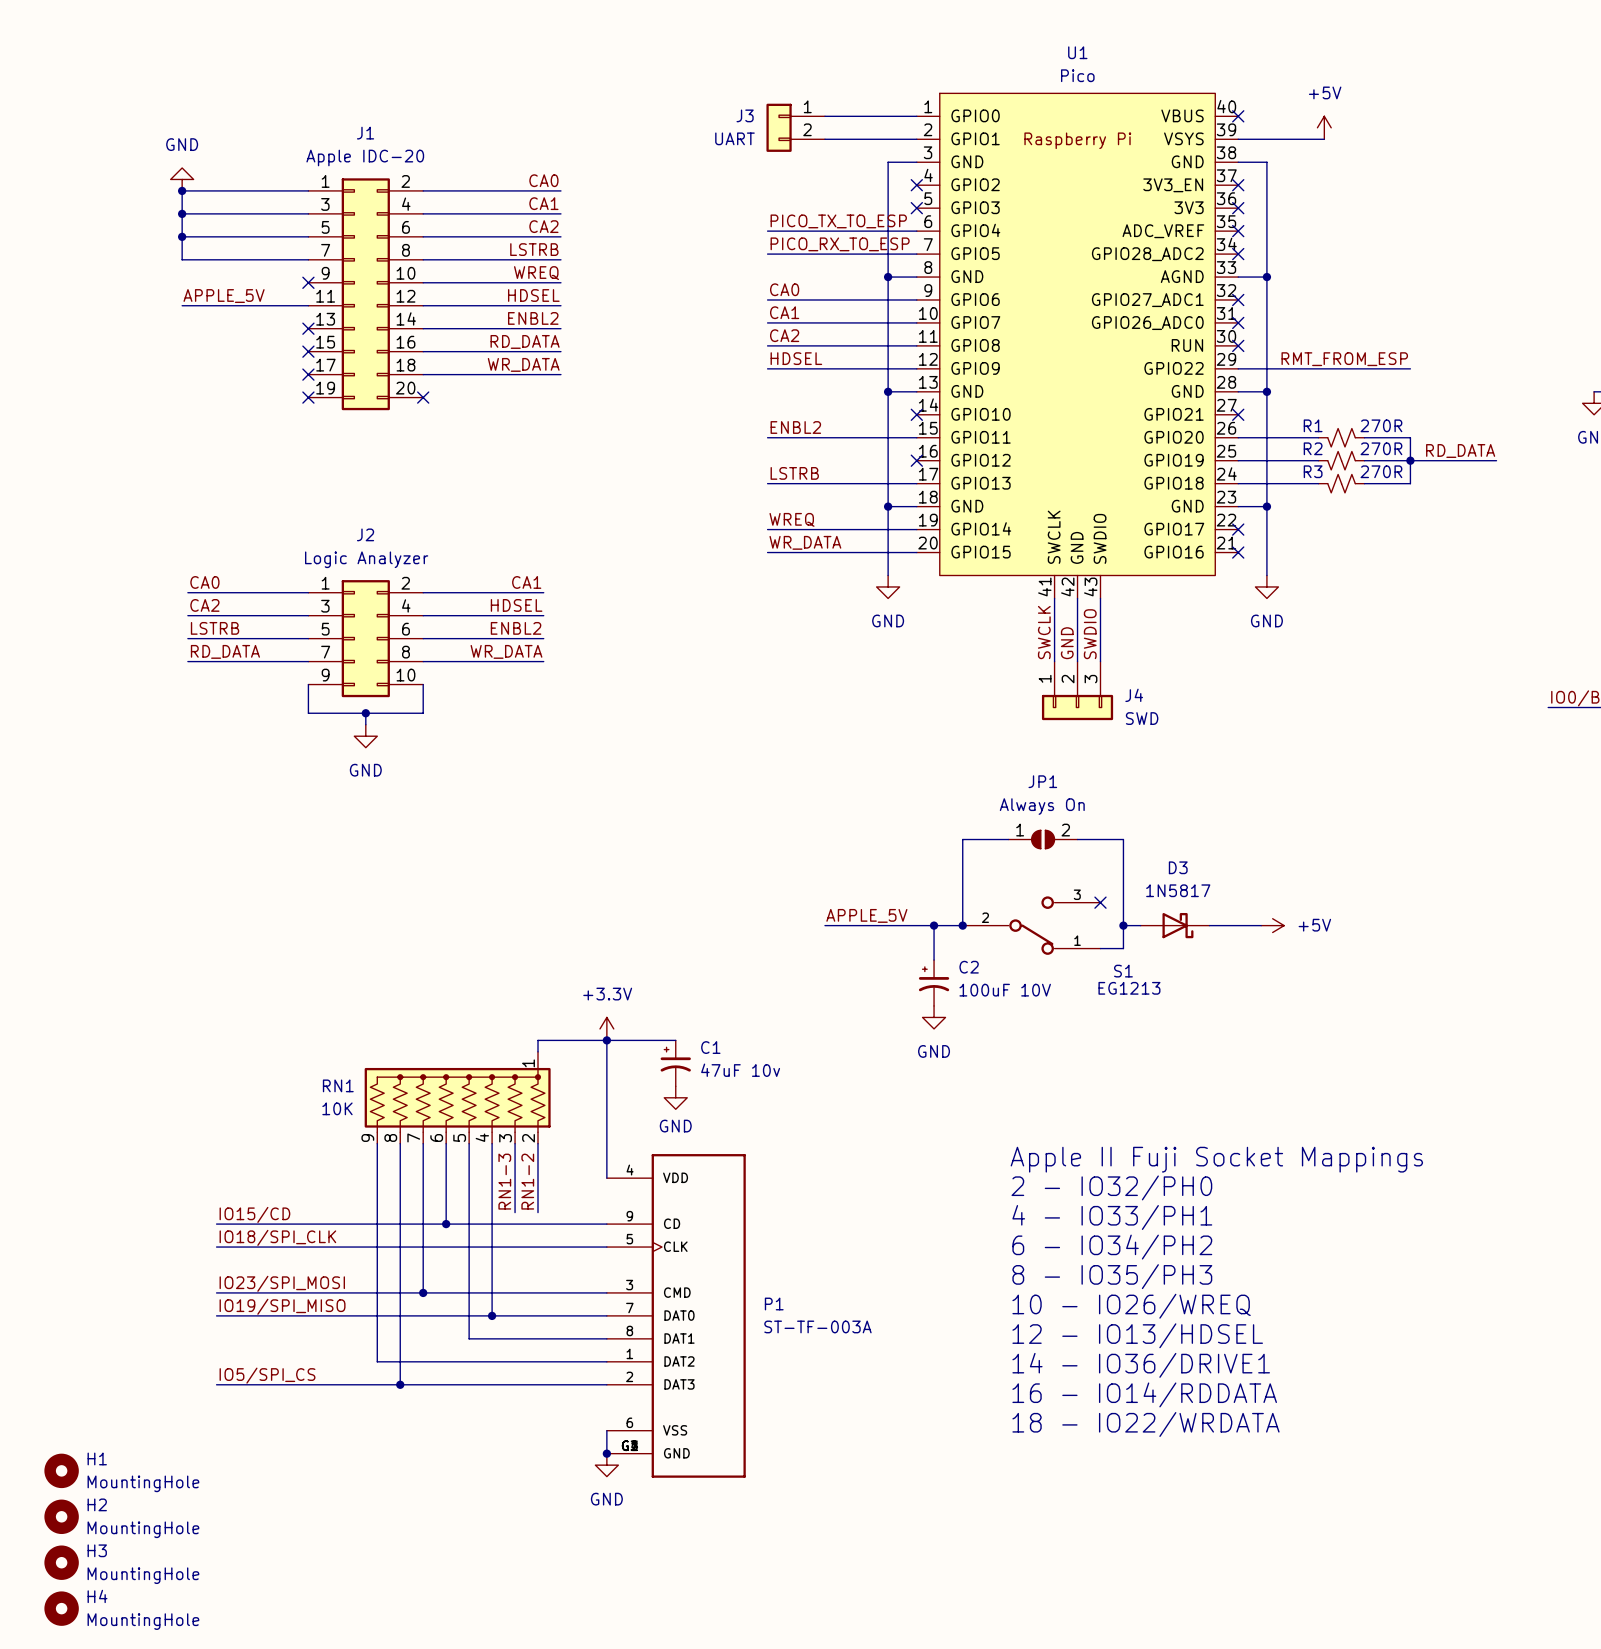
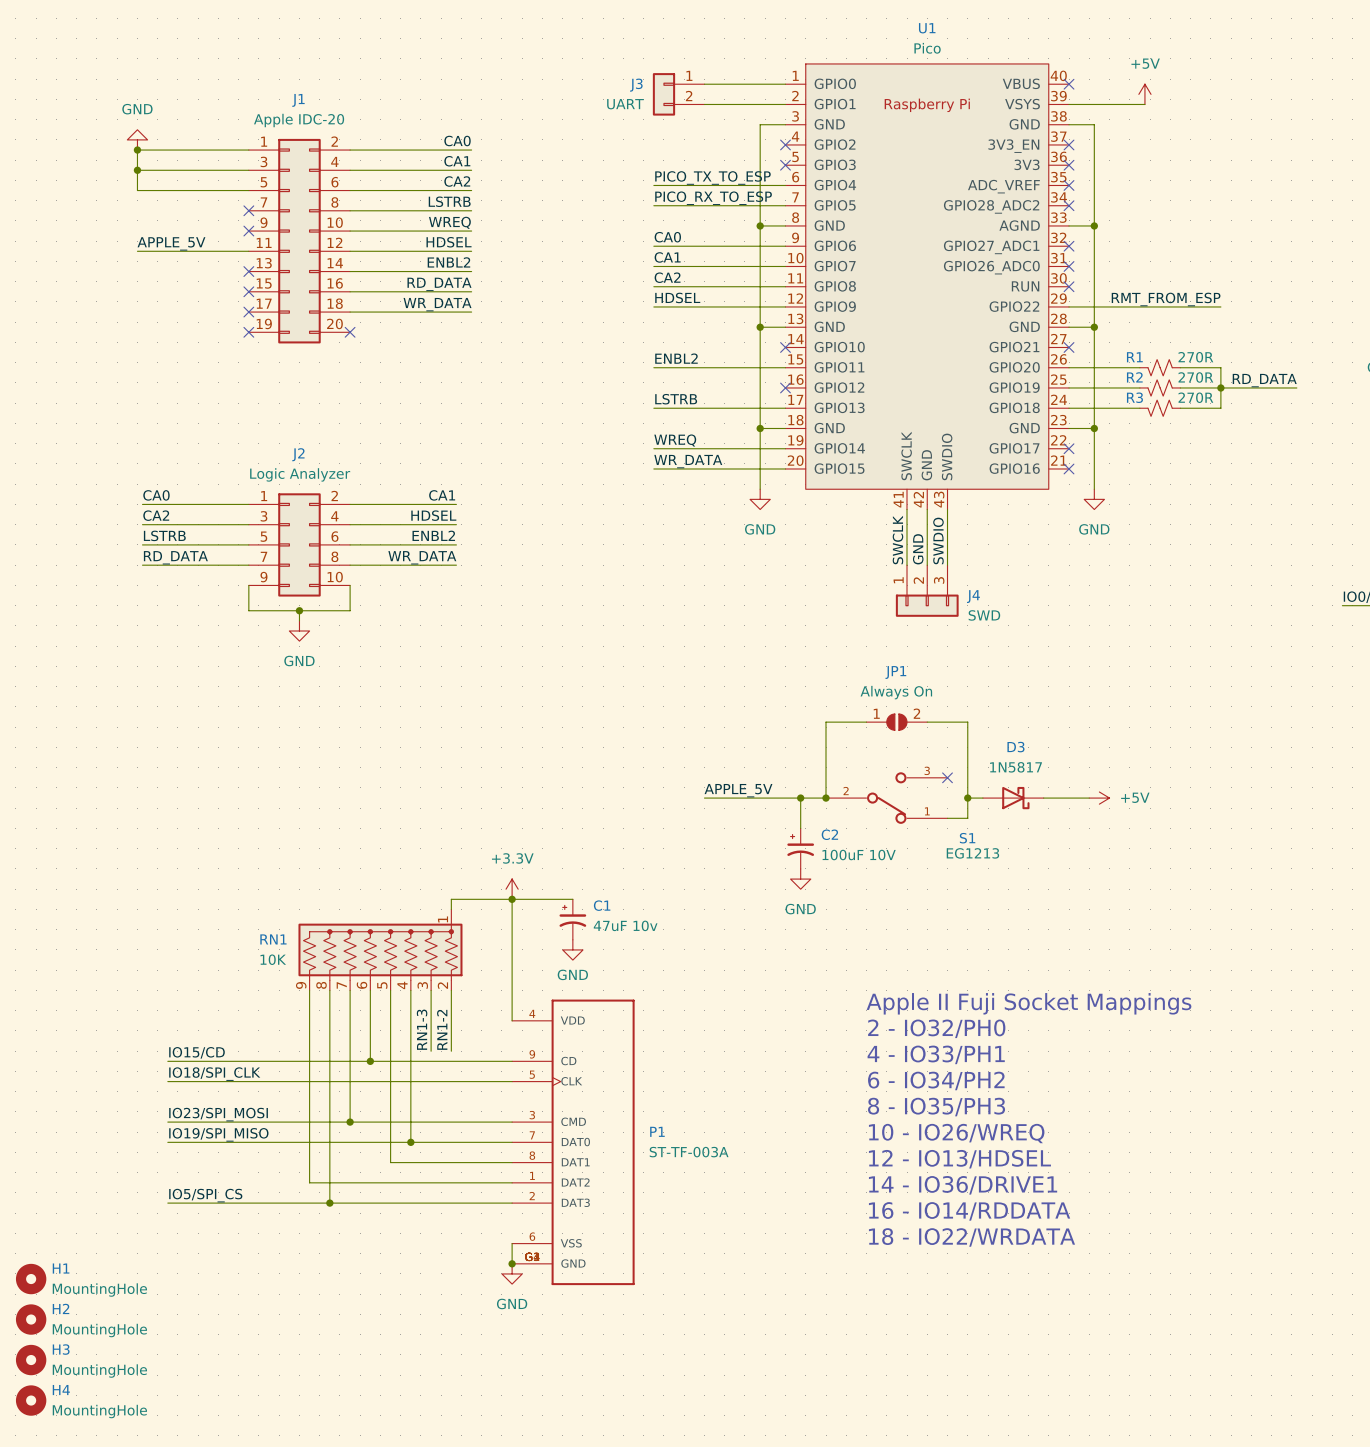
wire: (182, 236) (182, 259) (308, 259) -> none
junction: (182, 236) -> none
no-connect mark: none -> (248, 210)

